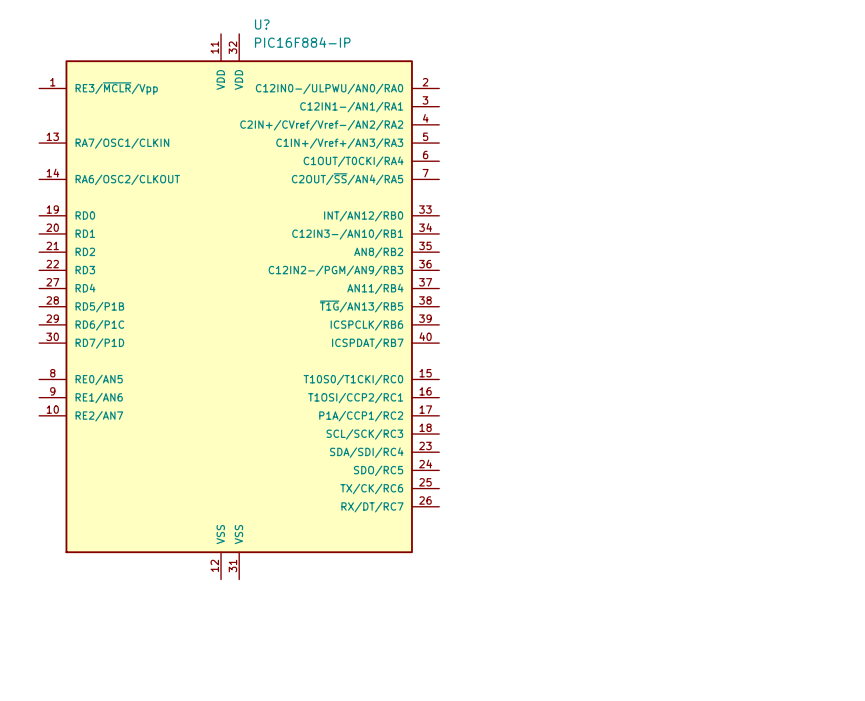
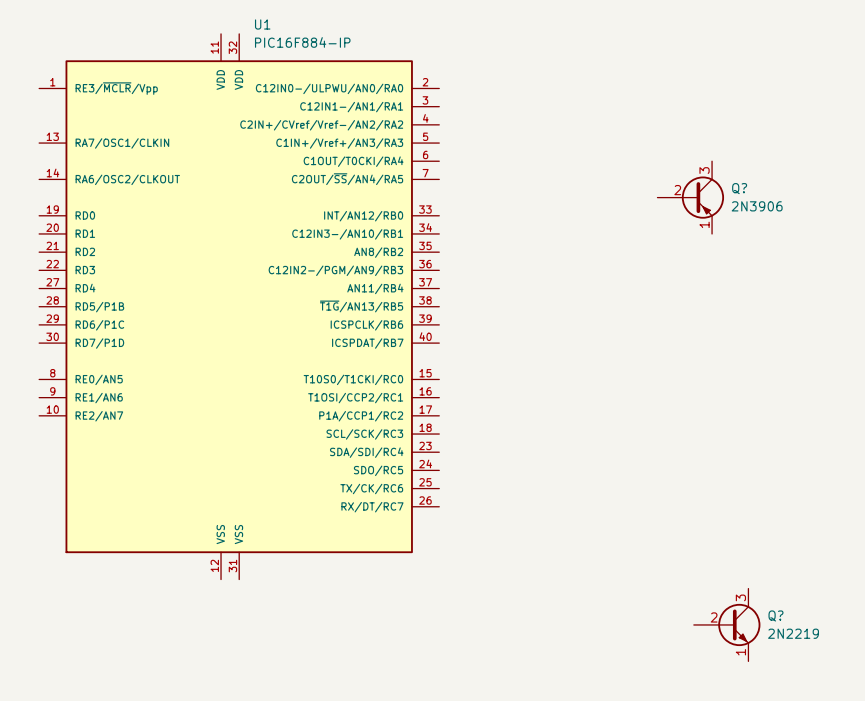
U? name: U? (262, 24) -> U1 (262, 24)
Q?: none -> 2N3906 (690, 197)
Q?: none -> 2N2219 (727, 624)

